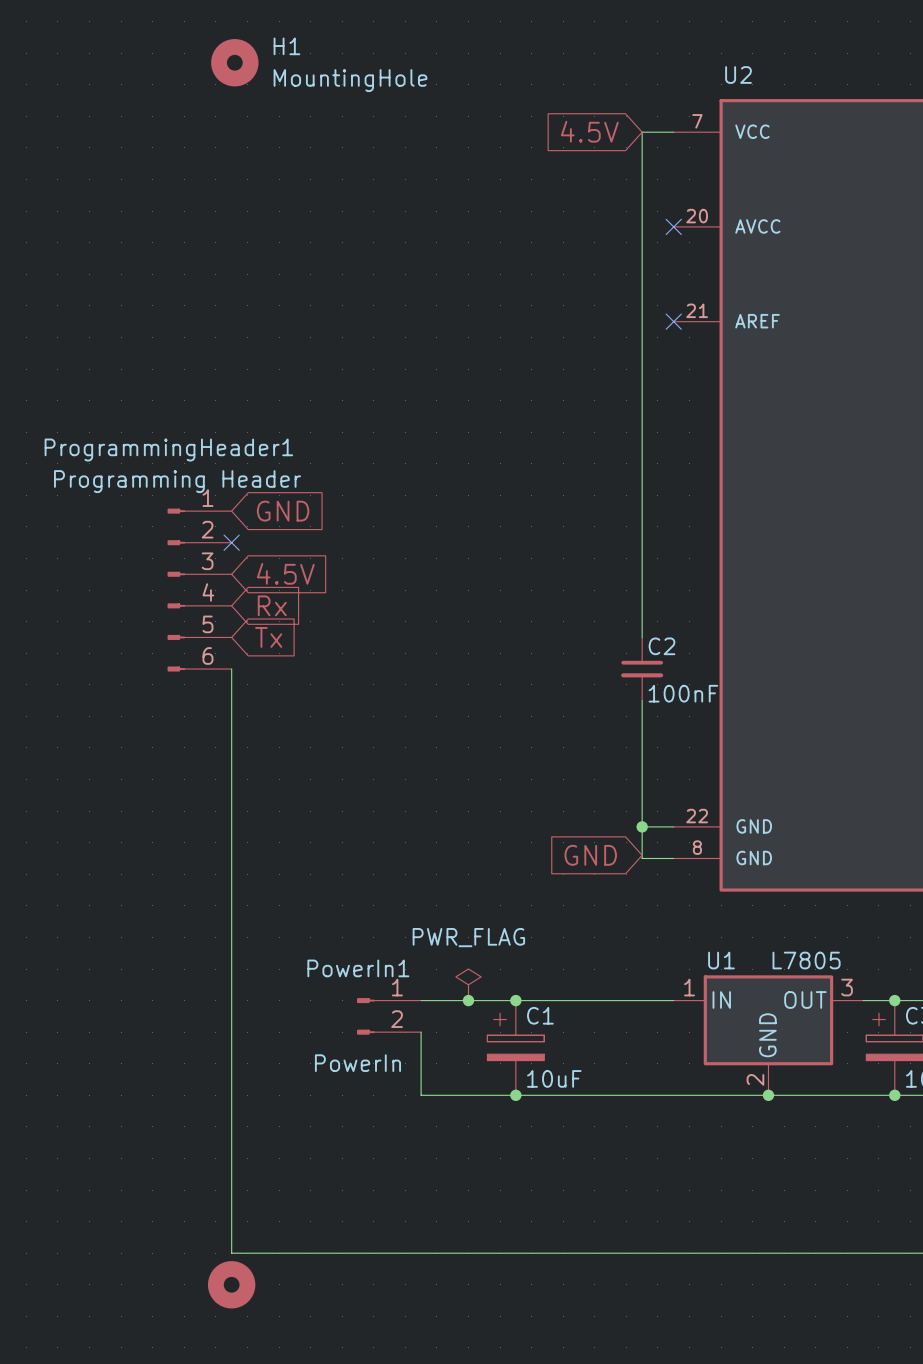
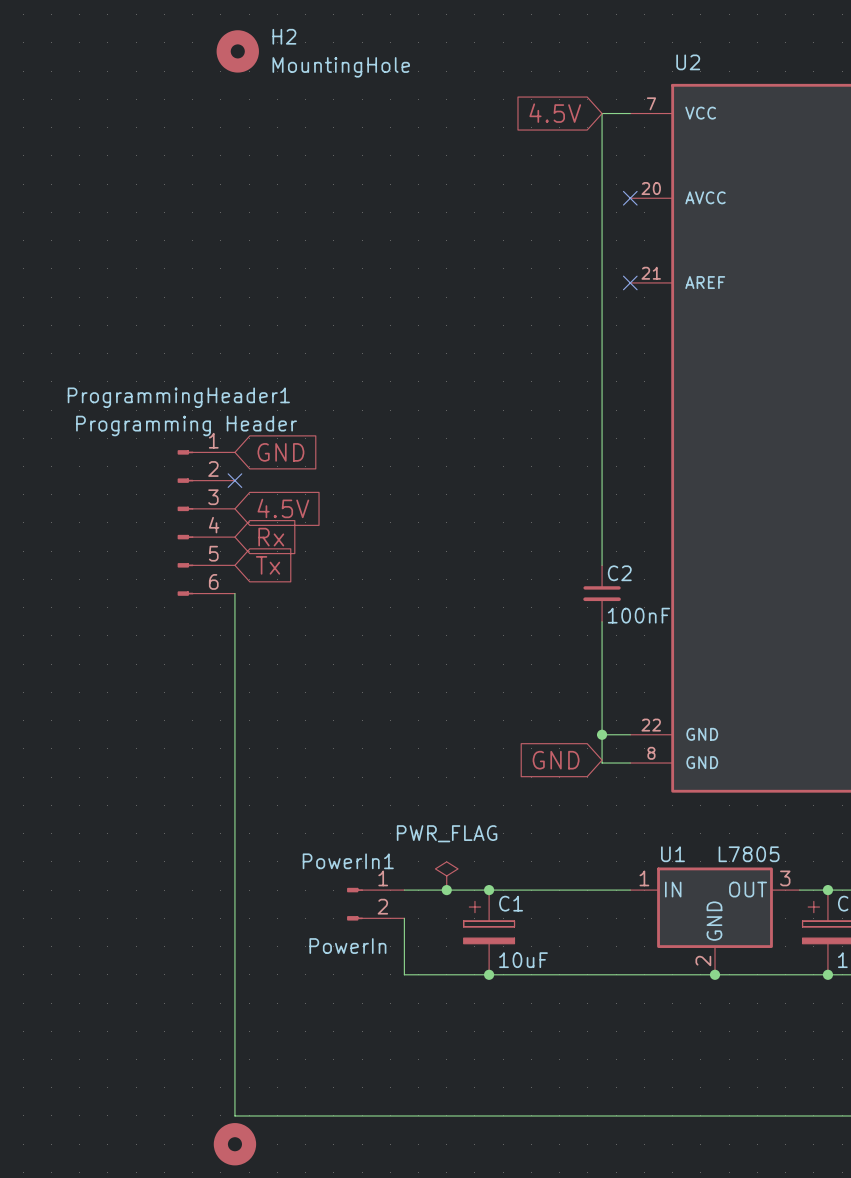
H1 name: H1 (286, 46) -> H2 (284, 36)

